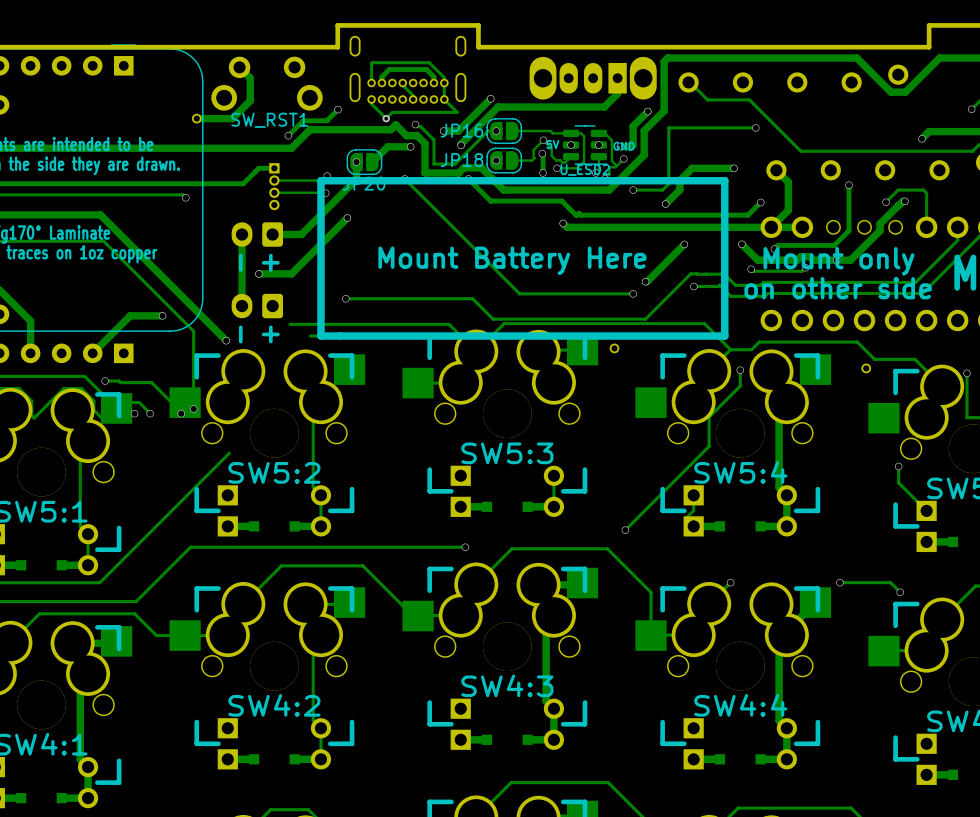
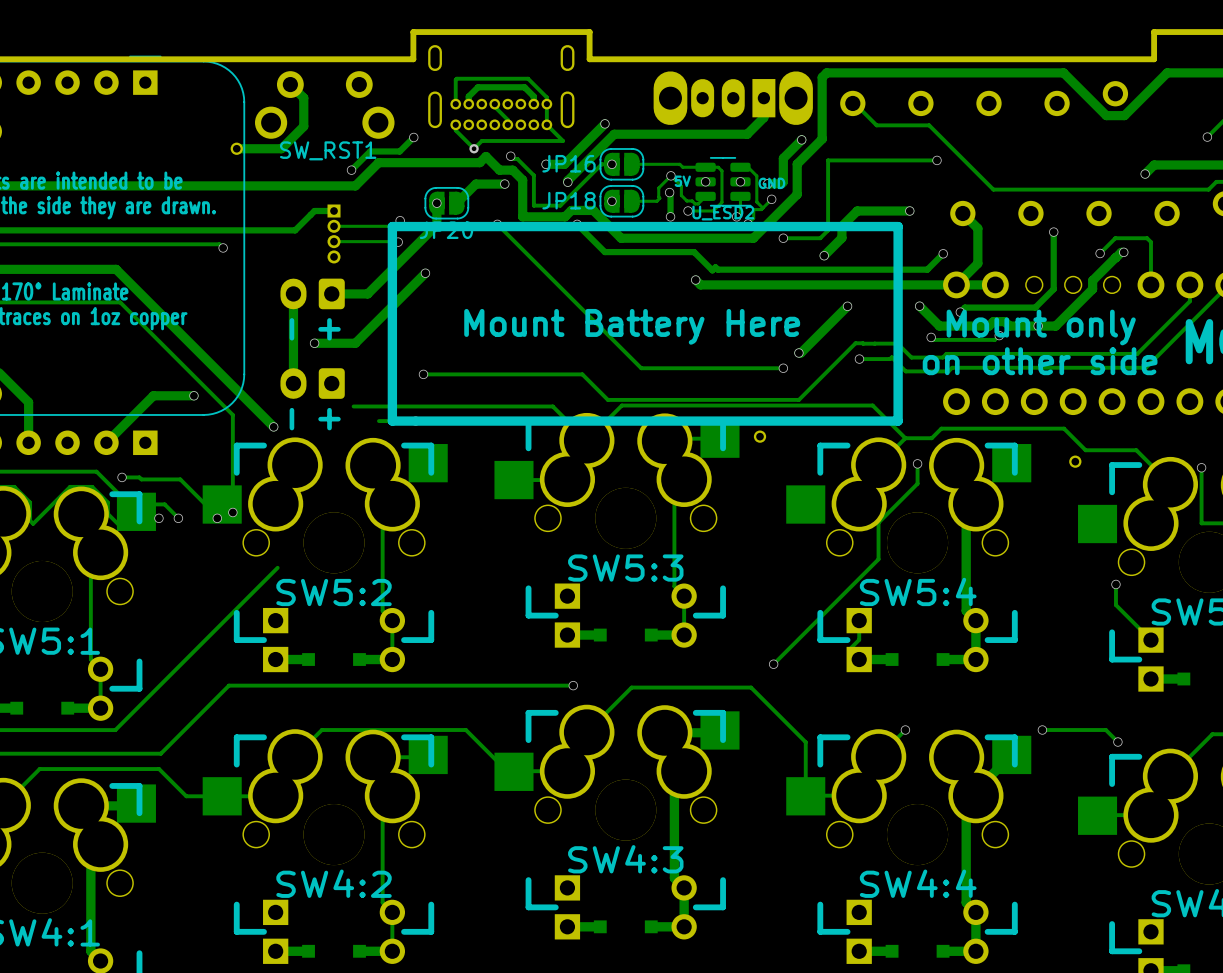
track: none -> (674, 489) (674, 586) (684, 596)
track: (379, 582) (362, 565) (281, 565) (264, 582) -> (465, 730) (321, 730)

